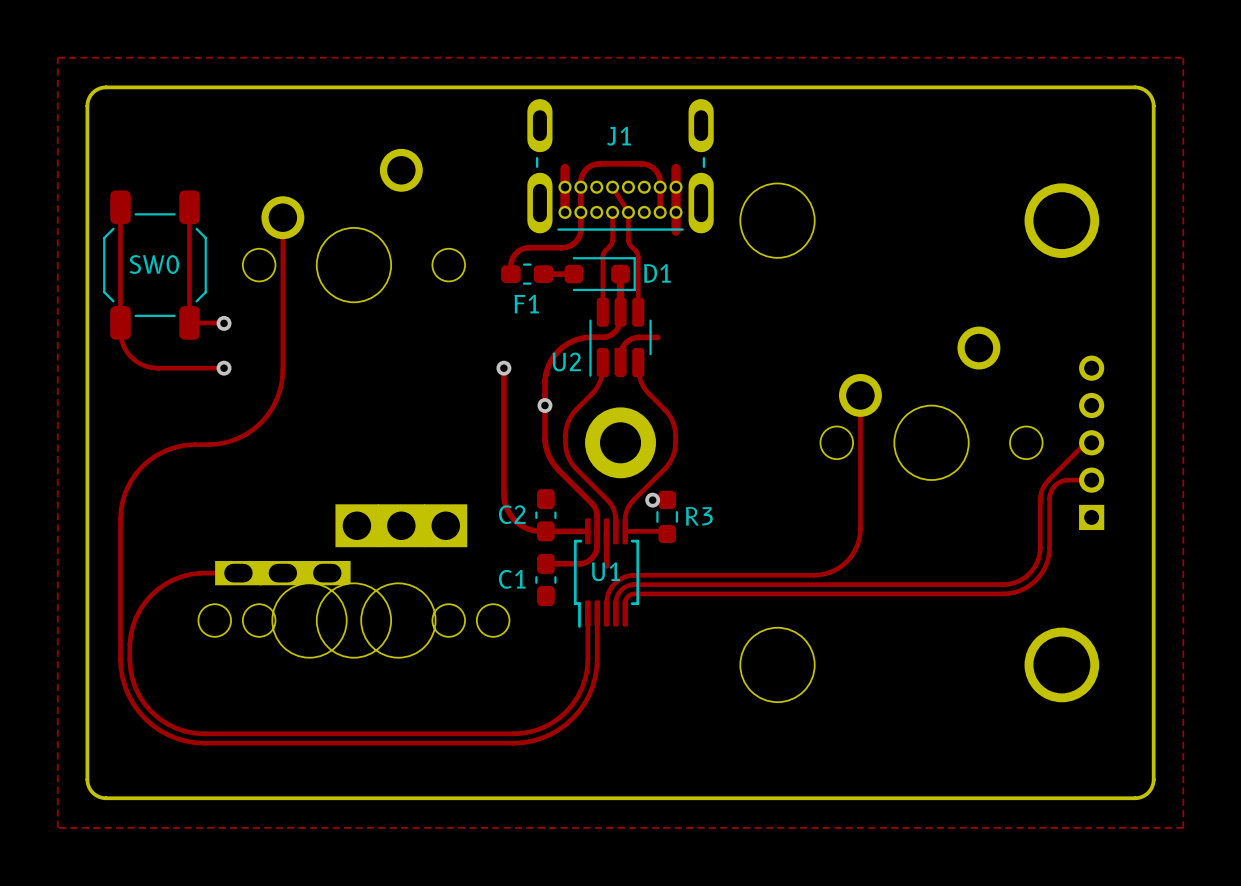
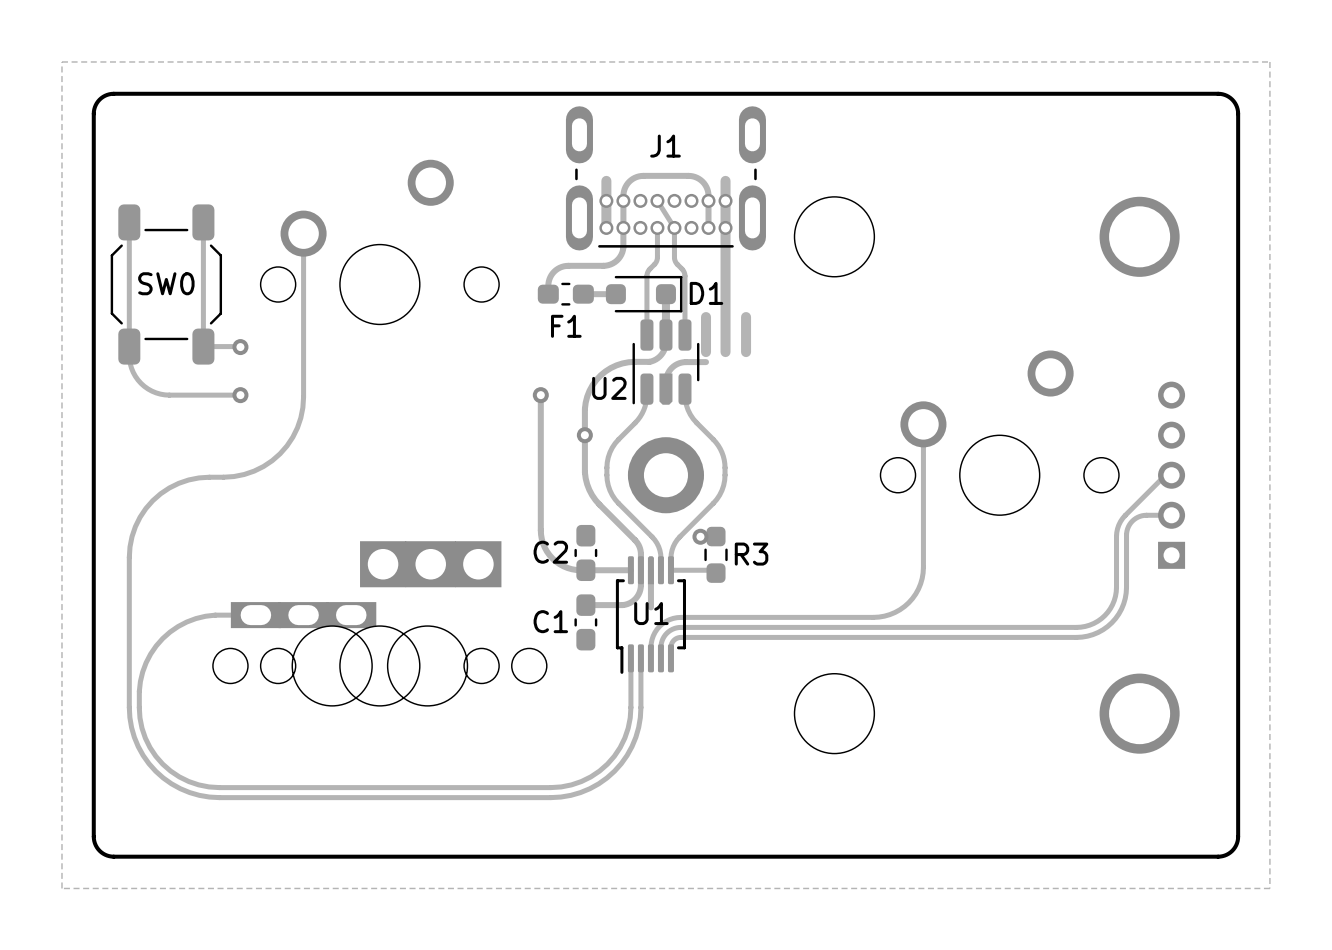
track: none -> (725, 247) (725, 352)
track: none -> (706, 317) (706, 352)
track: none -> (746, 317) (746, 352)

